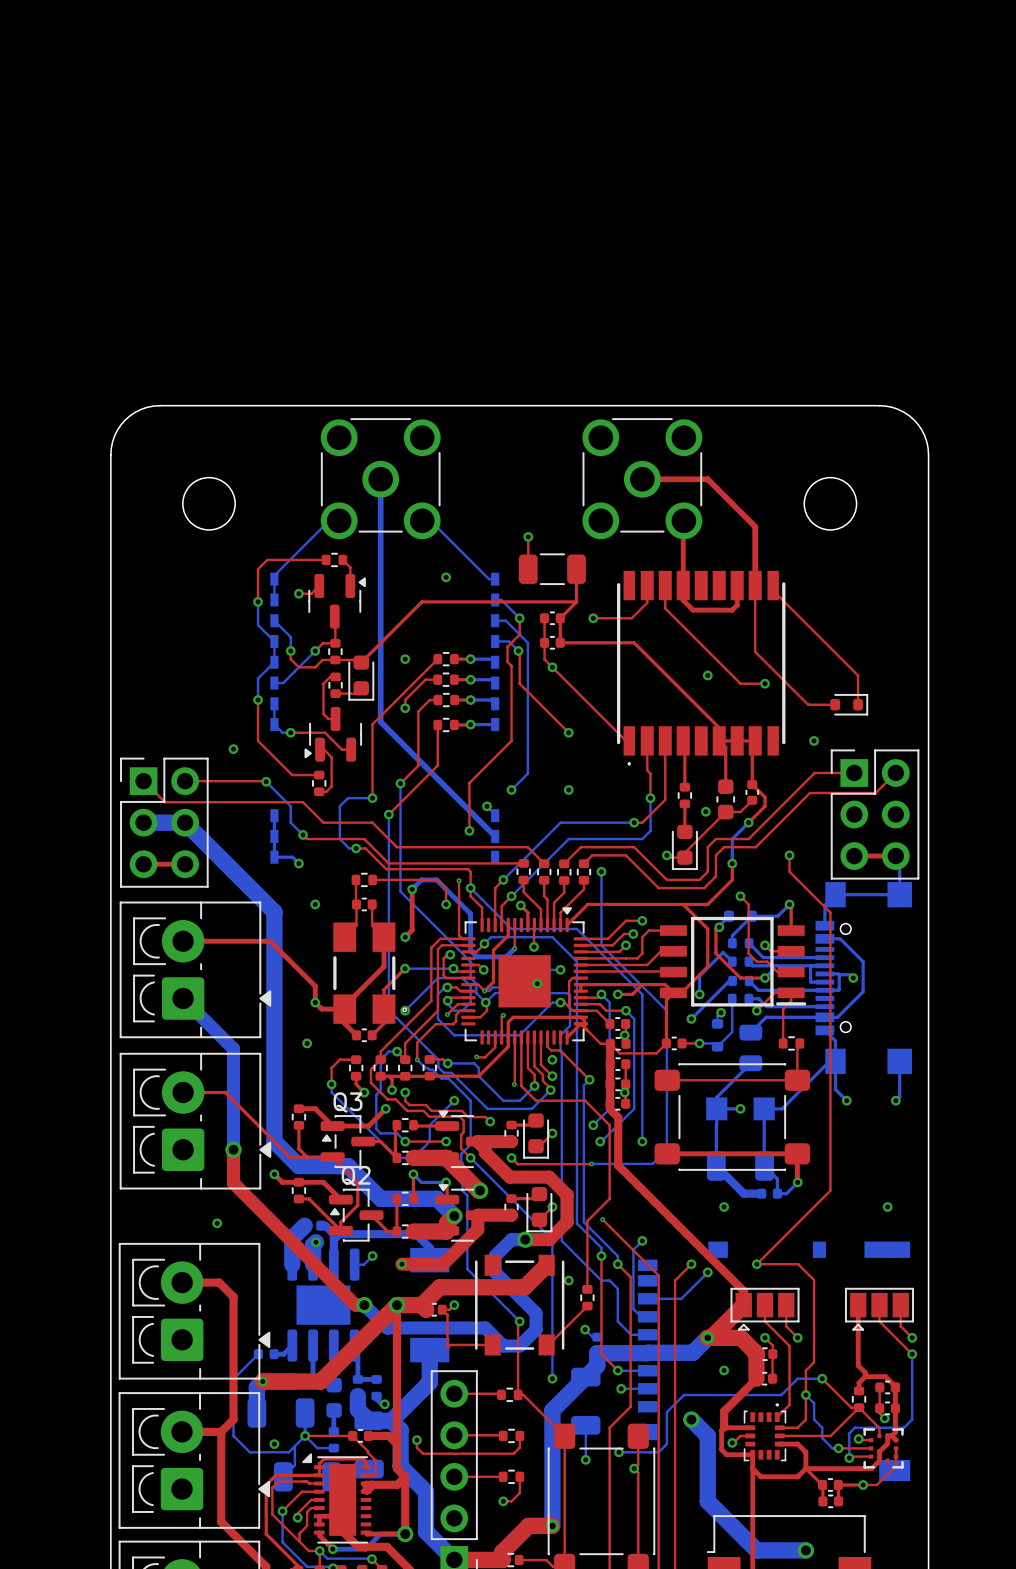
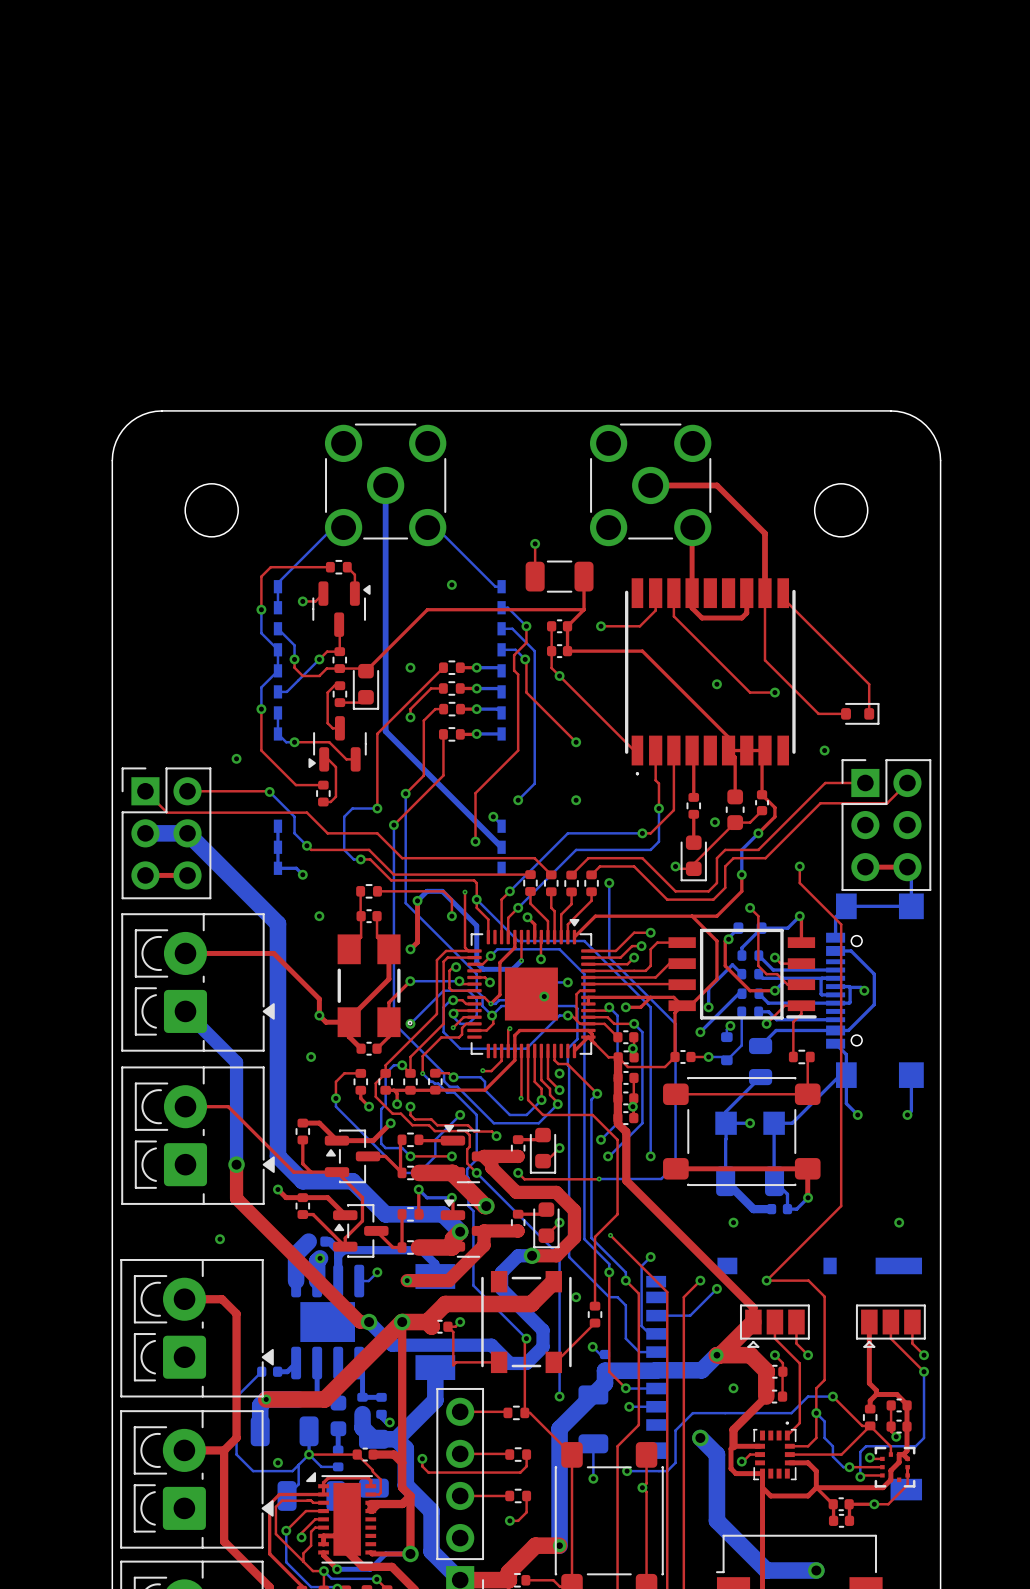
Q3 name: Q3 (348, 1102) -> none
Q2 name: Q2 (356, 1176) -> none

